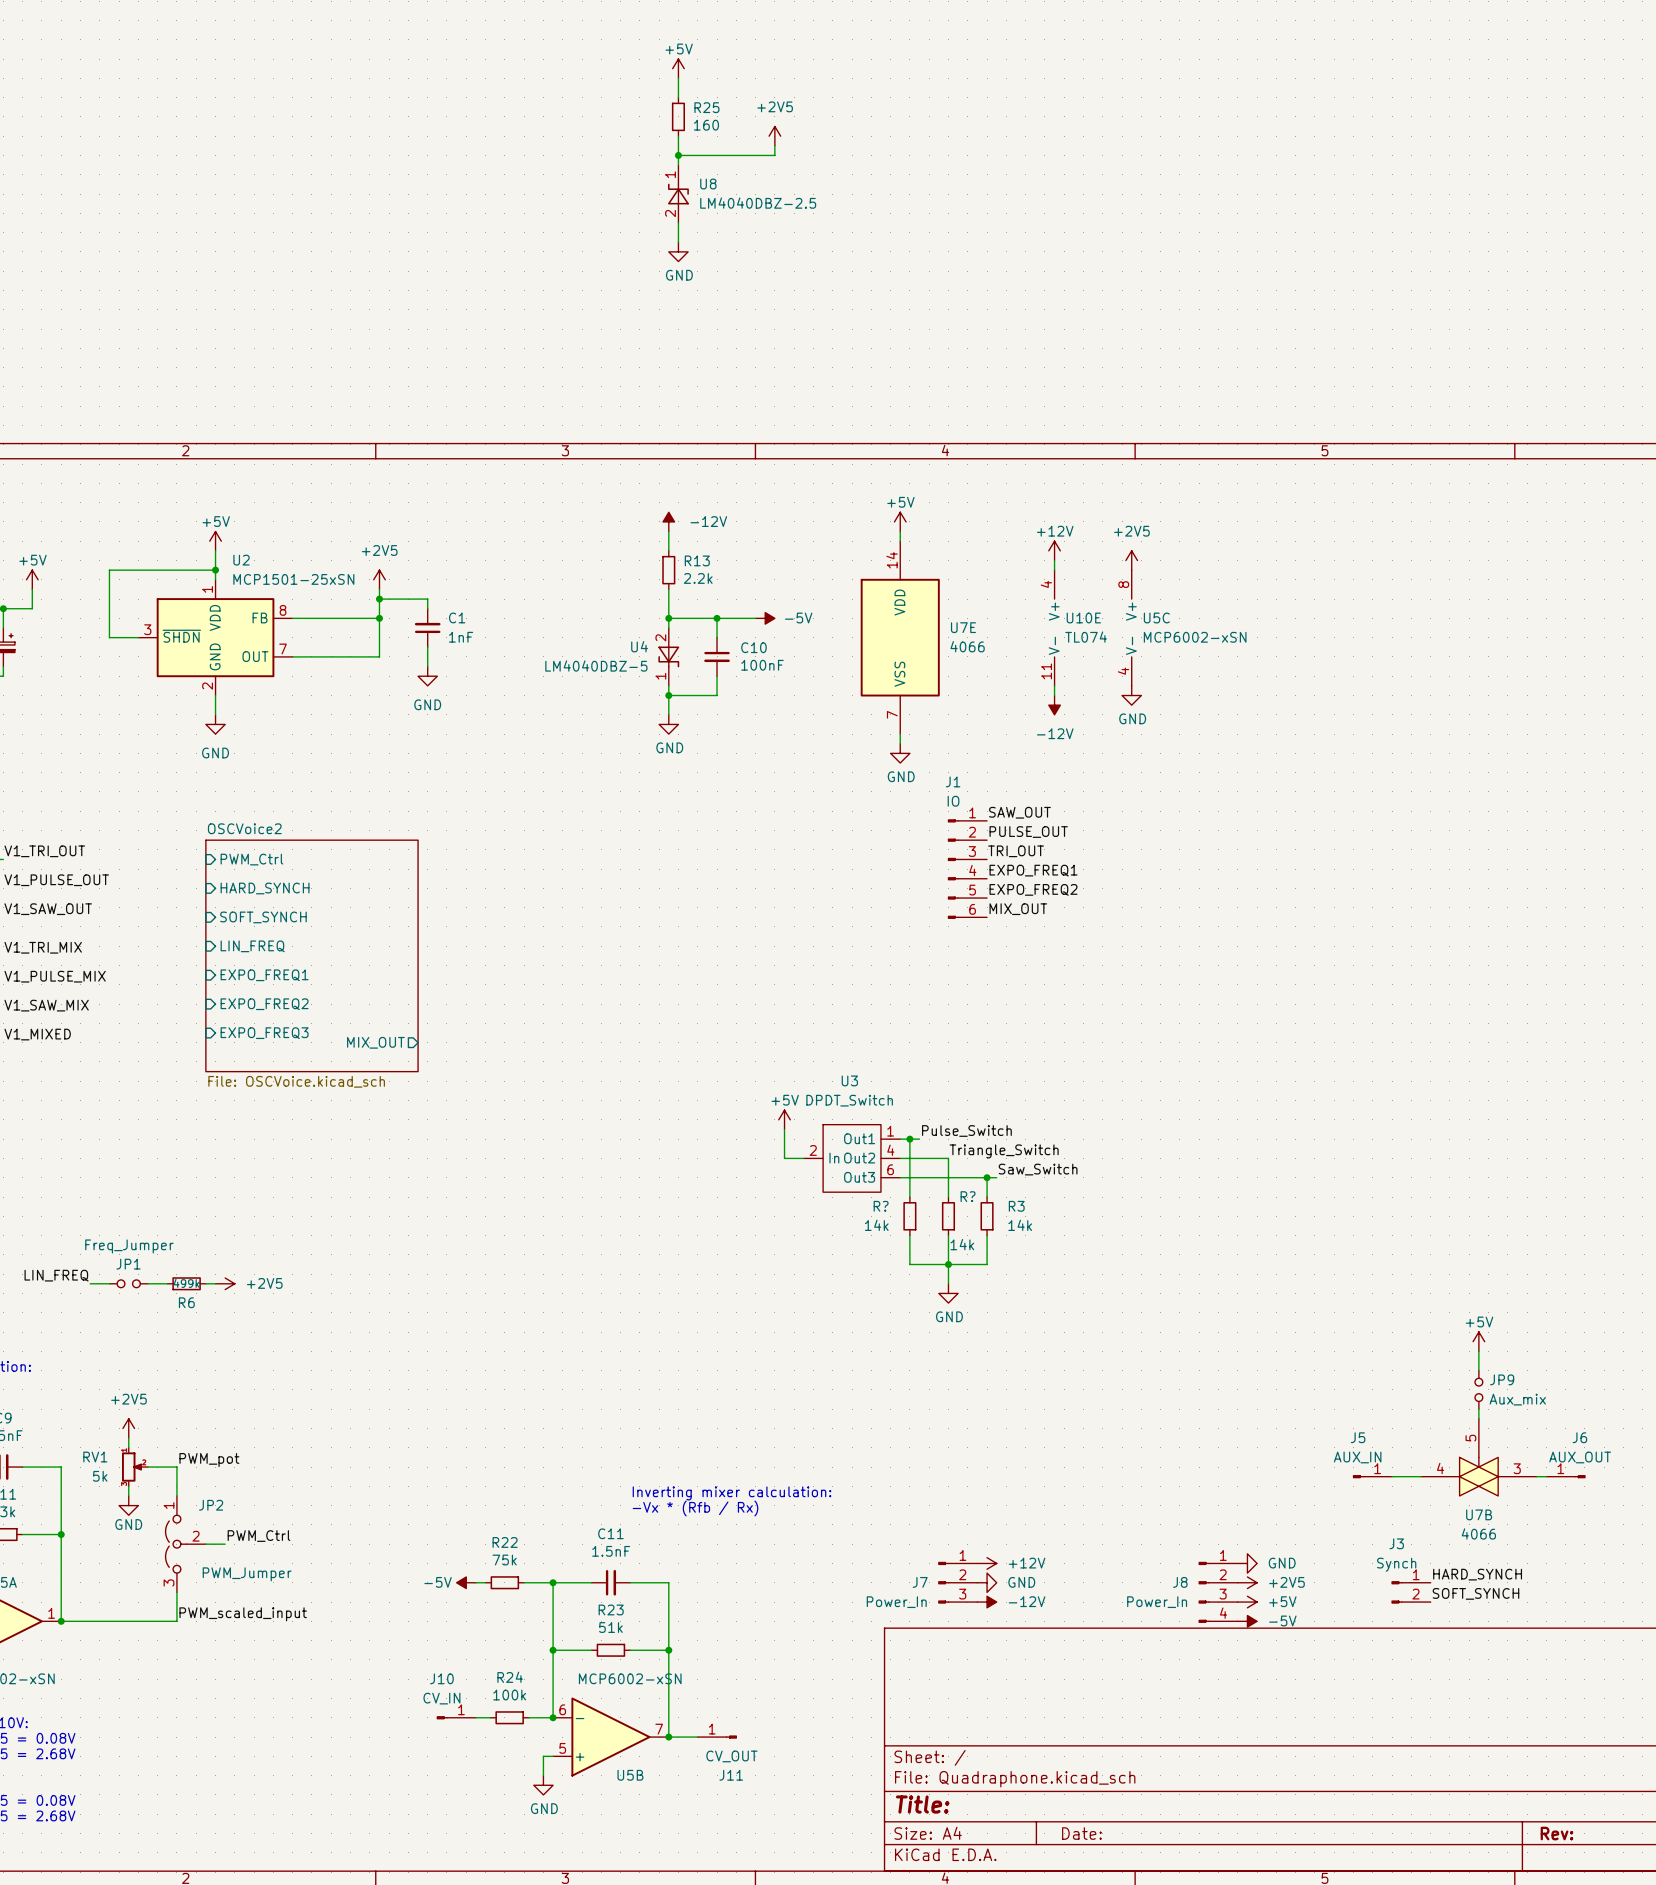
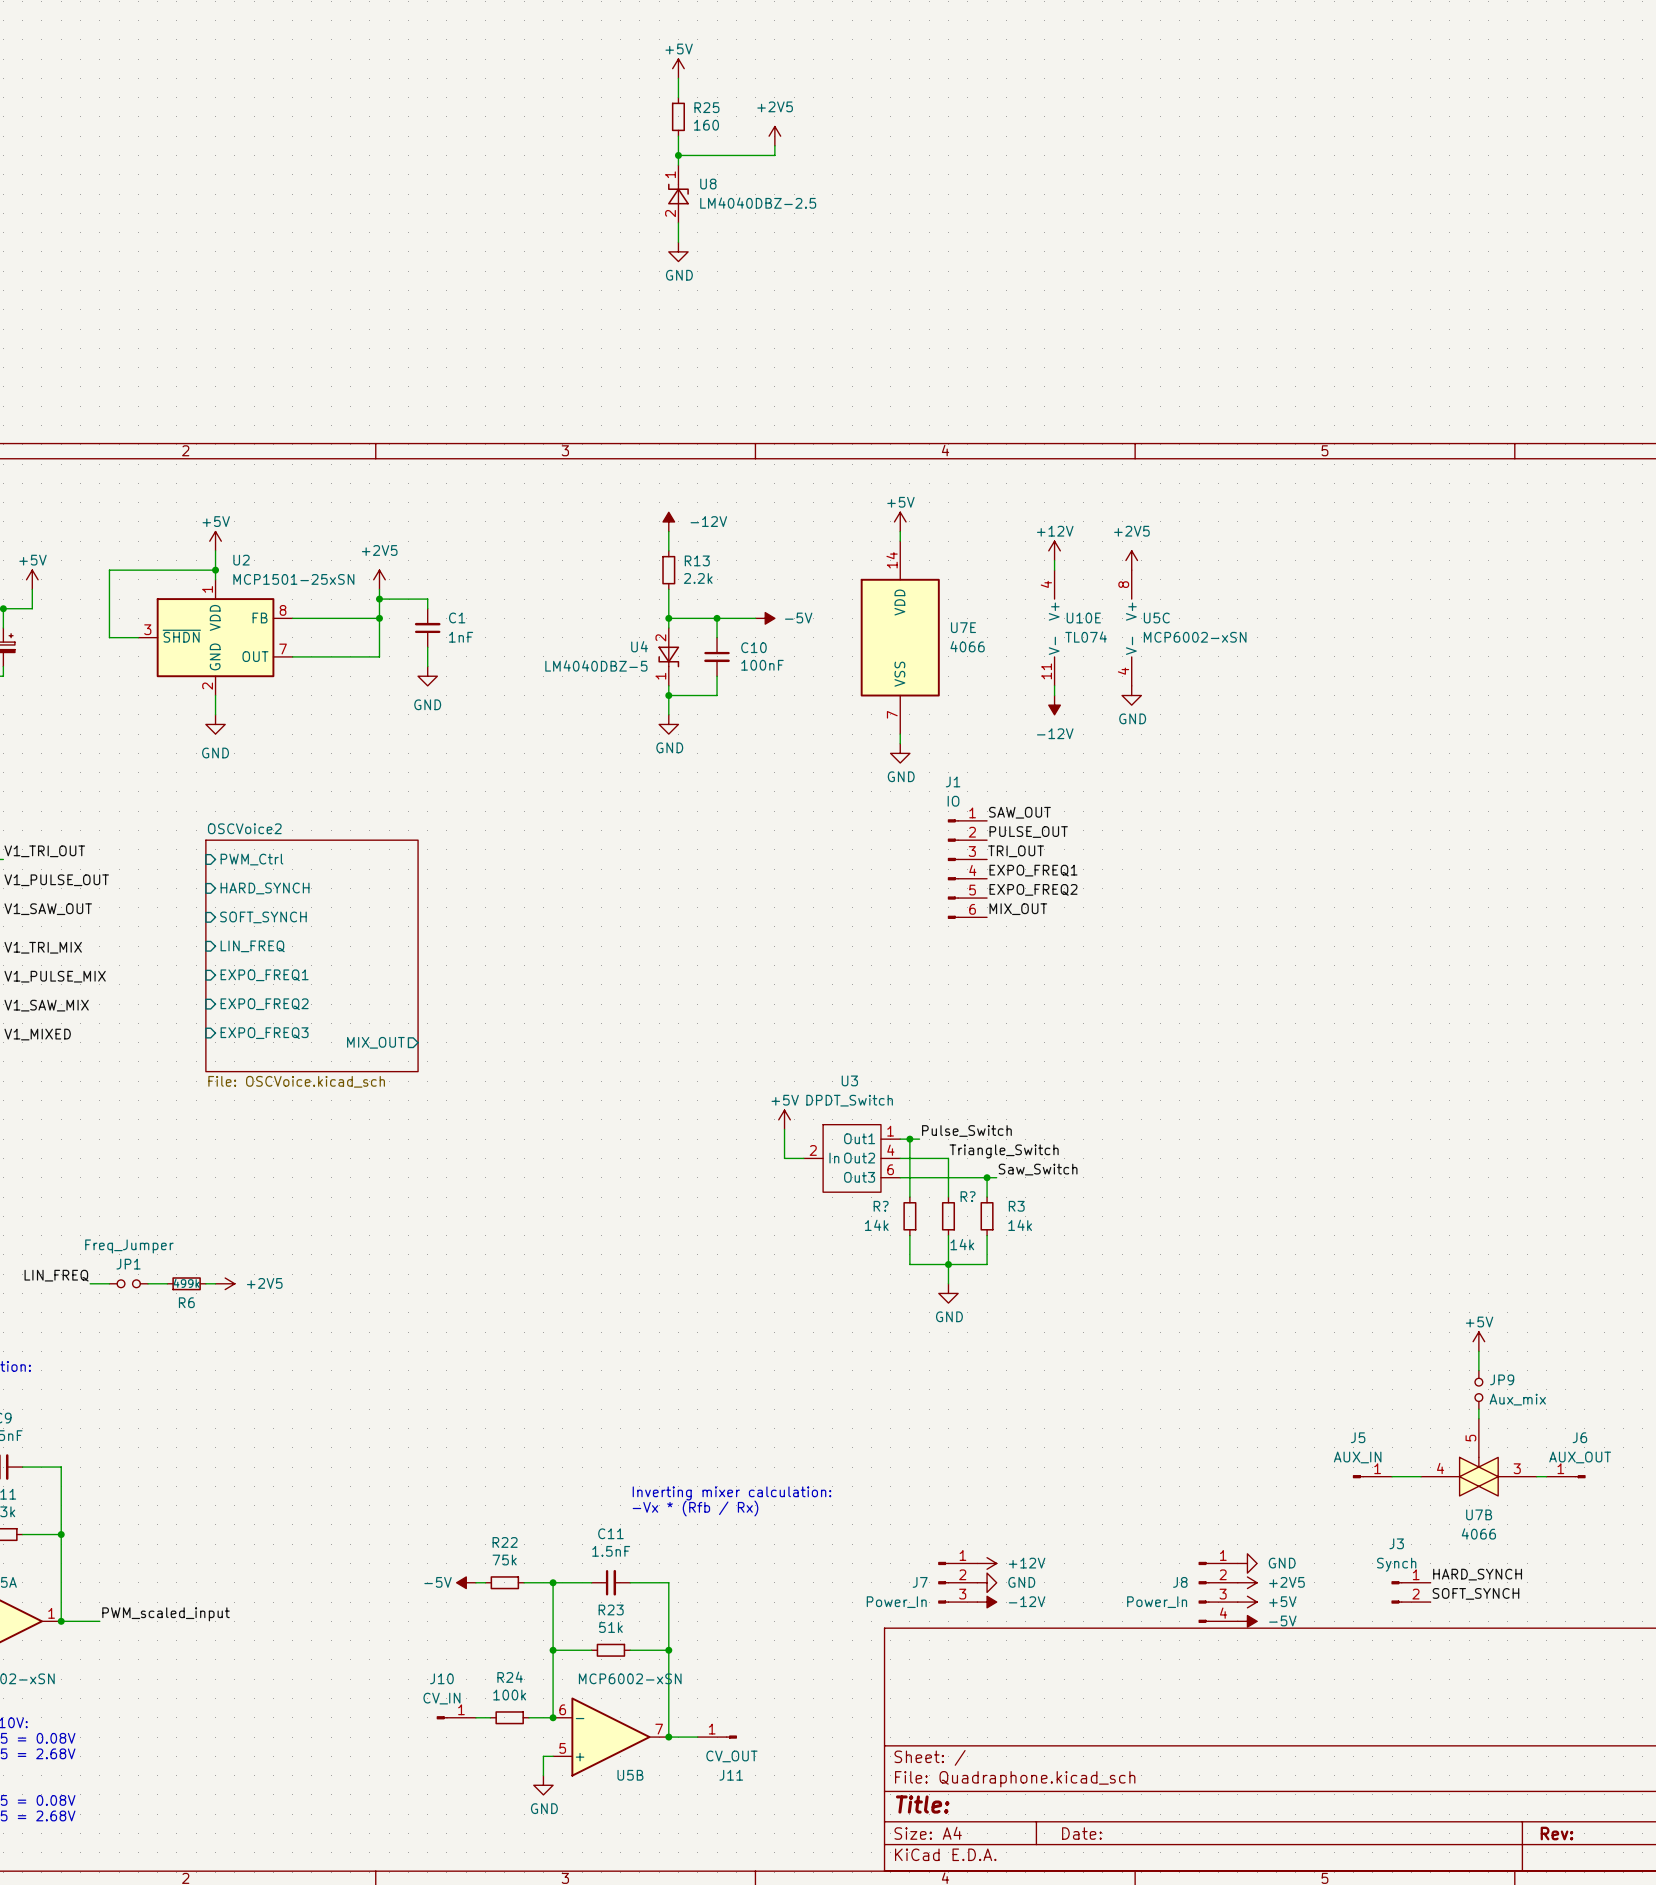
power symbol: +2V5 (128, 1428) -> none
wire: (128, 1438) (128, 1447) -> none
label: PWM_pot (209, 1460) -> none
RV1: 5k (135, 1467) -> none
wire: (148, 1467) (176, 1467) (176, 1495) -> none
wire: (128, 1486) (128, 1495) -> none
power symbol: GND (128, 1505) -> none
label: PWM_Ctrl (259, 1536) -> none
JP2: PWM_Jumper (185, 1544) -> none
wire: (205, 1544) (225, 1544) -> none
wire: (176, 1592) (176, 1621) (99, 1621) -> none
label position: PWM_scaled_input (243, 1614) -> PWM_scaled_input (166, 1614)

